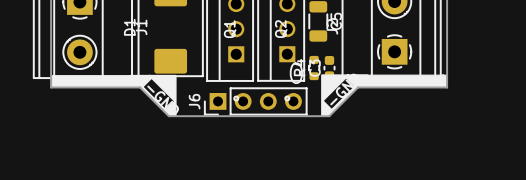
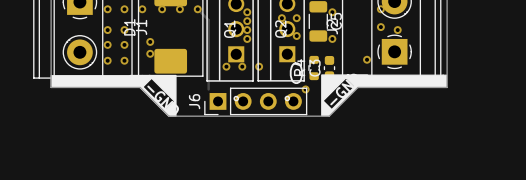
via: none -> (107, 9)
via: none -> (124, 9)
via: none -> (142, 9)
via: none -> (162, 9)
via: none -> (179, 9)
track: none -> (197, 9) (208, 20) (208, 89)
via: none -> (197, 9)
via: none -> (380, 9)
via: none -> (247, 12)
via: none -> (332, 12)
via: none -> (281, 18)
via: none -> (296, 18)
via: none -> (247, 21)
via: none -> (380, 27)
via: none -> (107, 30)
via: none -> (124, 30)
via: none -> (247, 30)
via: none -> (397, 30)
via: none -> (296, 35)
via: none -> (247, 38)
via: none -> (332, 38)
via: none -> (150, 41)
via: none -> (107, 44)
via: none -> (124, 44)
via: none -> (150, 53)
via: none -> (367, 59)
via: none -> (107, 60)
via: none -> (124, 60)
via: none -> (226, 66)
via: none -> (242, 66)
via: none -> (259, 66)
via: none -> (305, 89)

